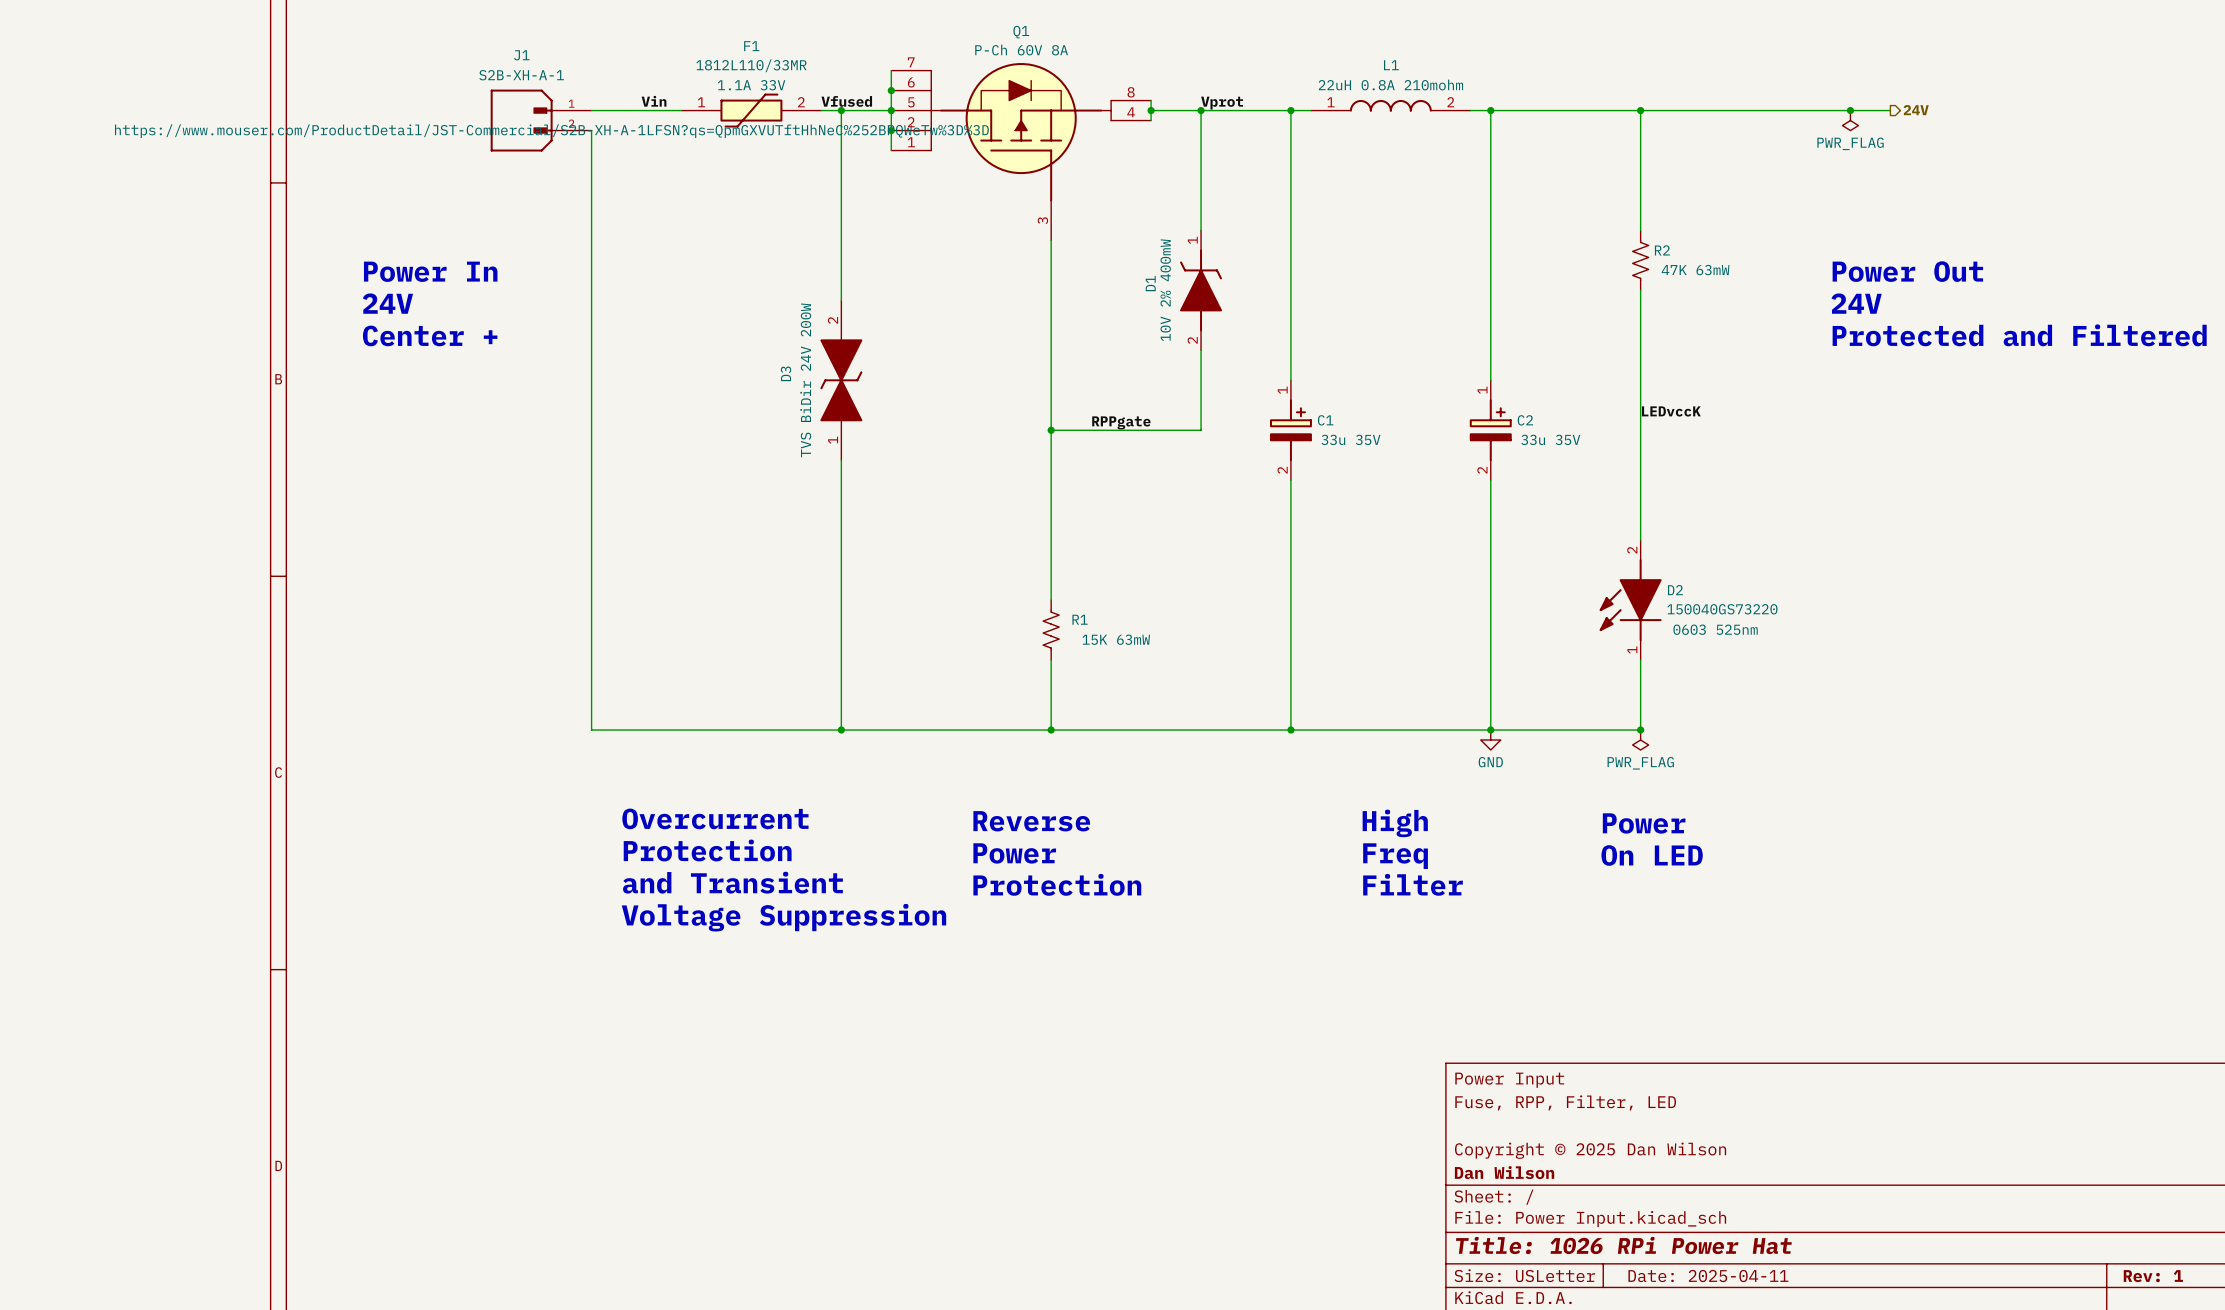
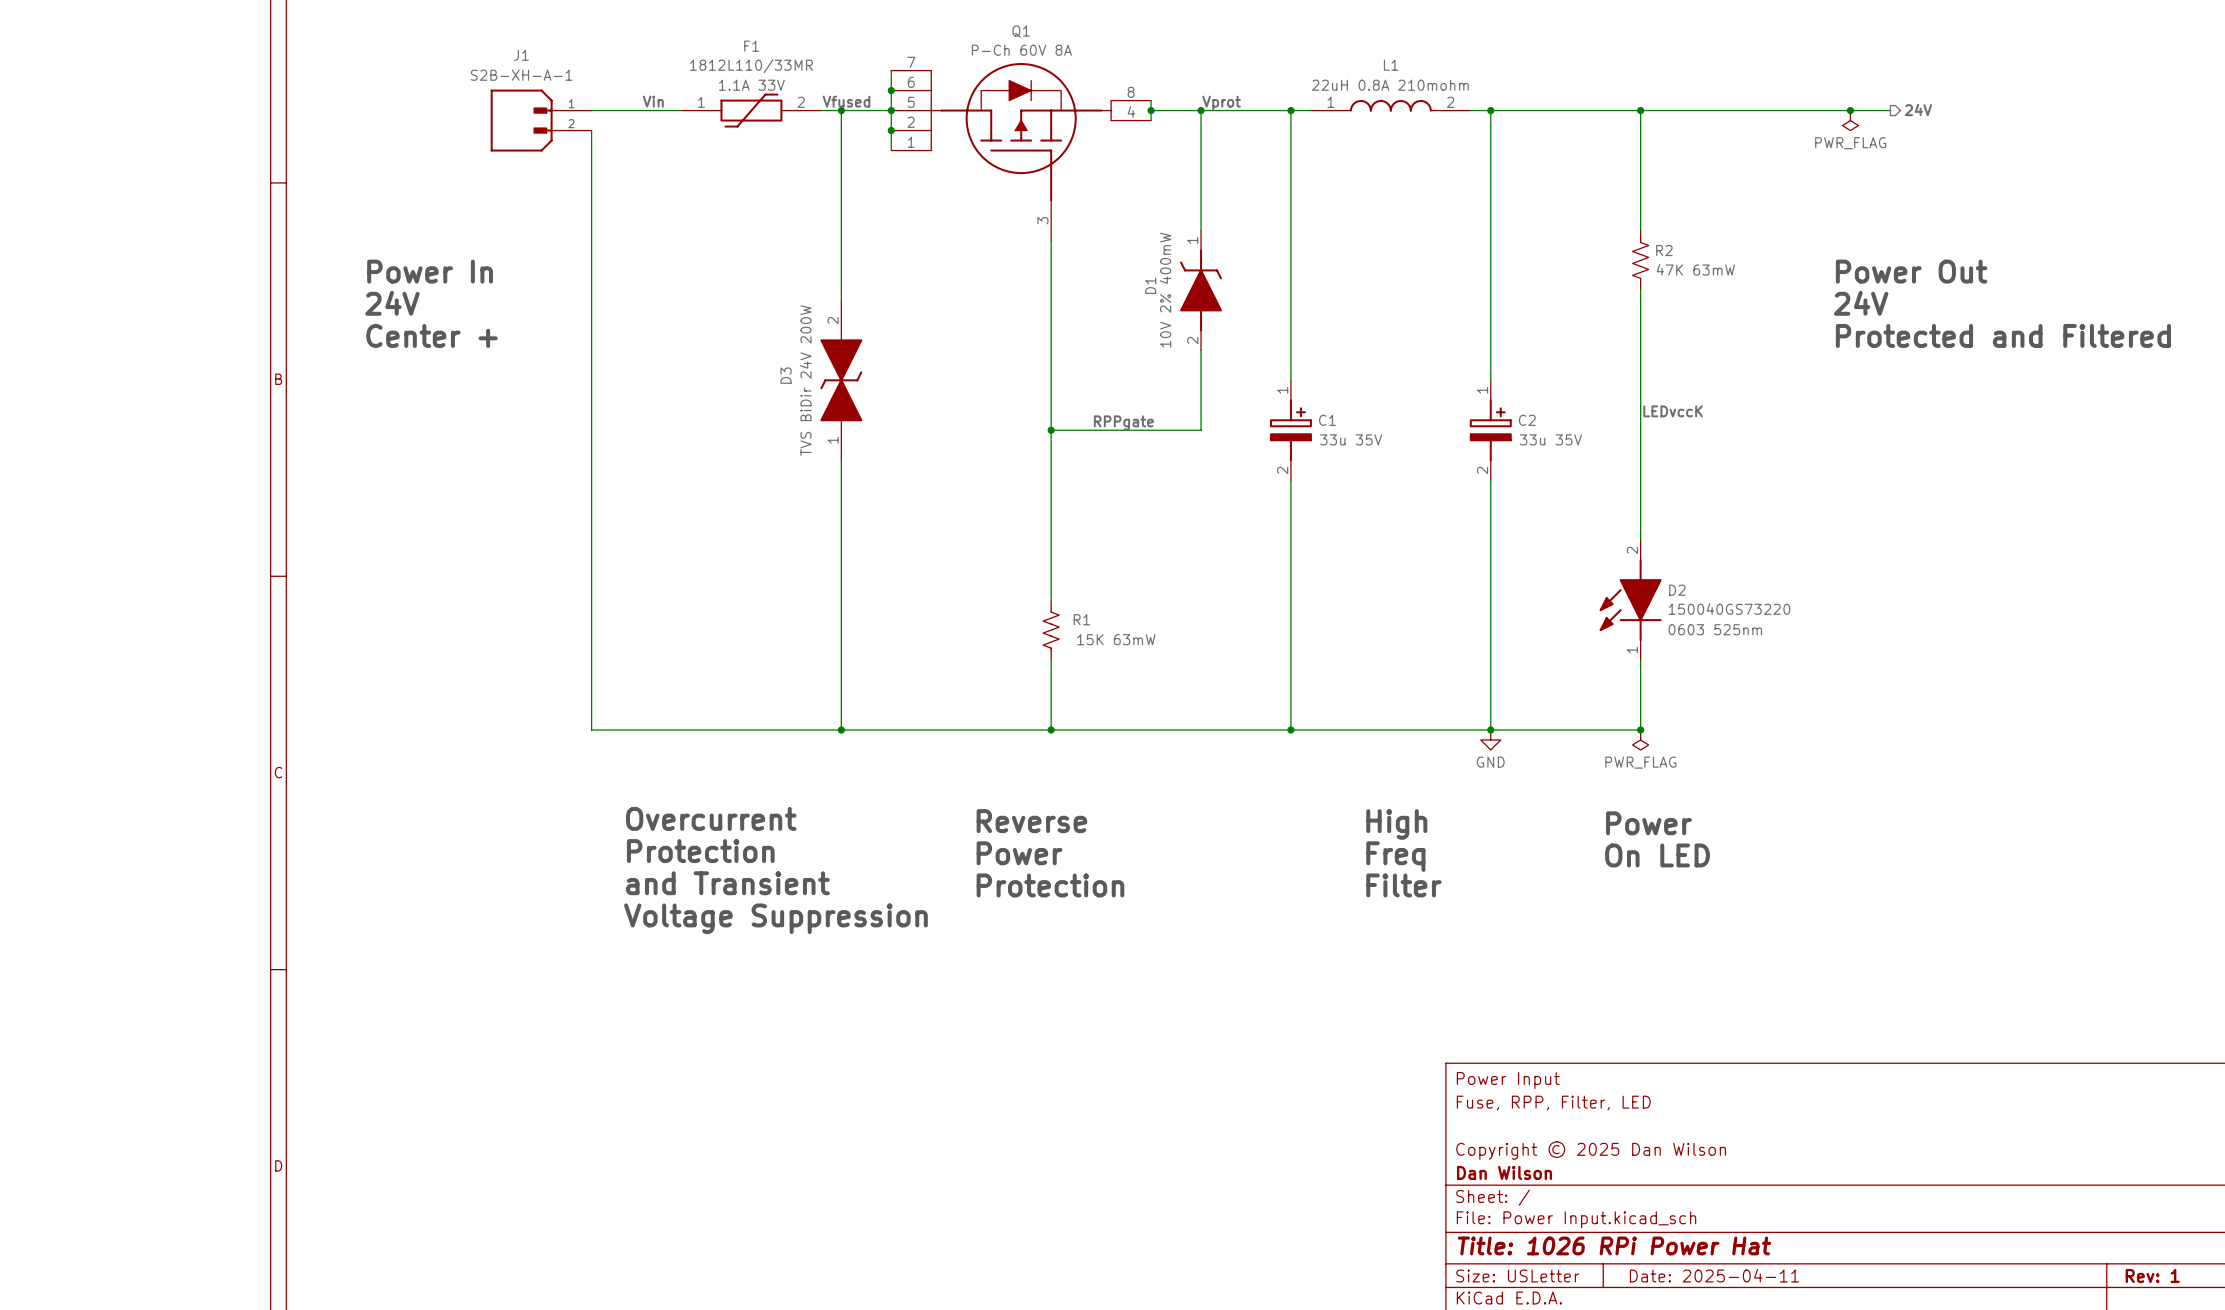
J1 text: https://www.mouser.com/ProductDetail/JST-Commercial/S2B-XH-A-1LFSN?qs=QpmGXVUTftHhNeC%252BPQWeTw%3D%3D (551, 131) -> none

